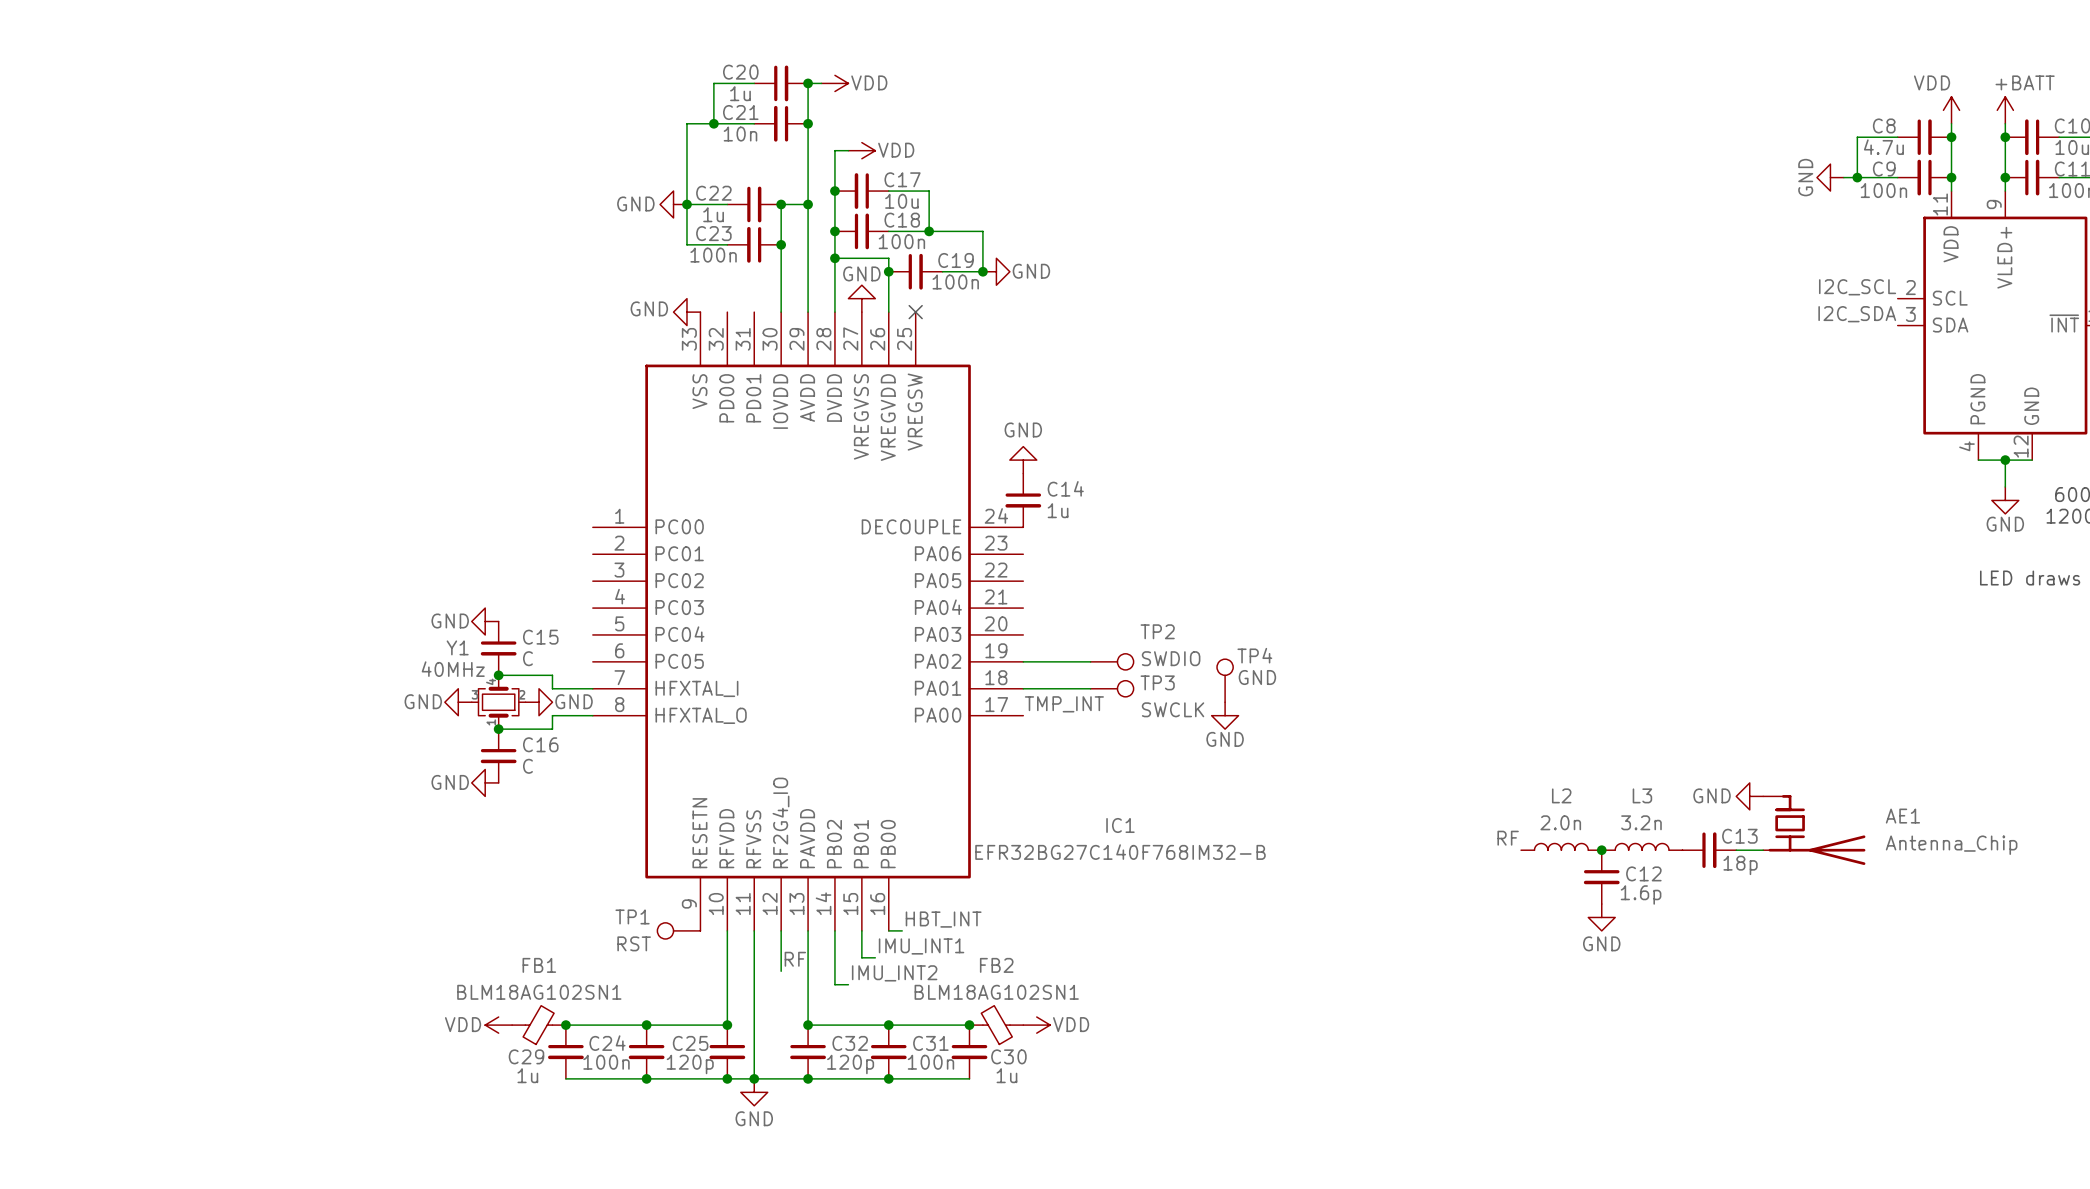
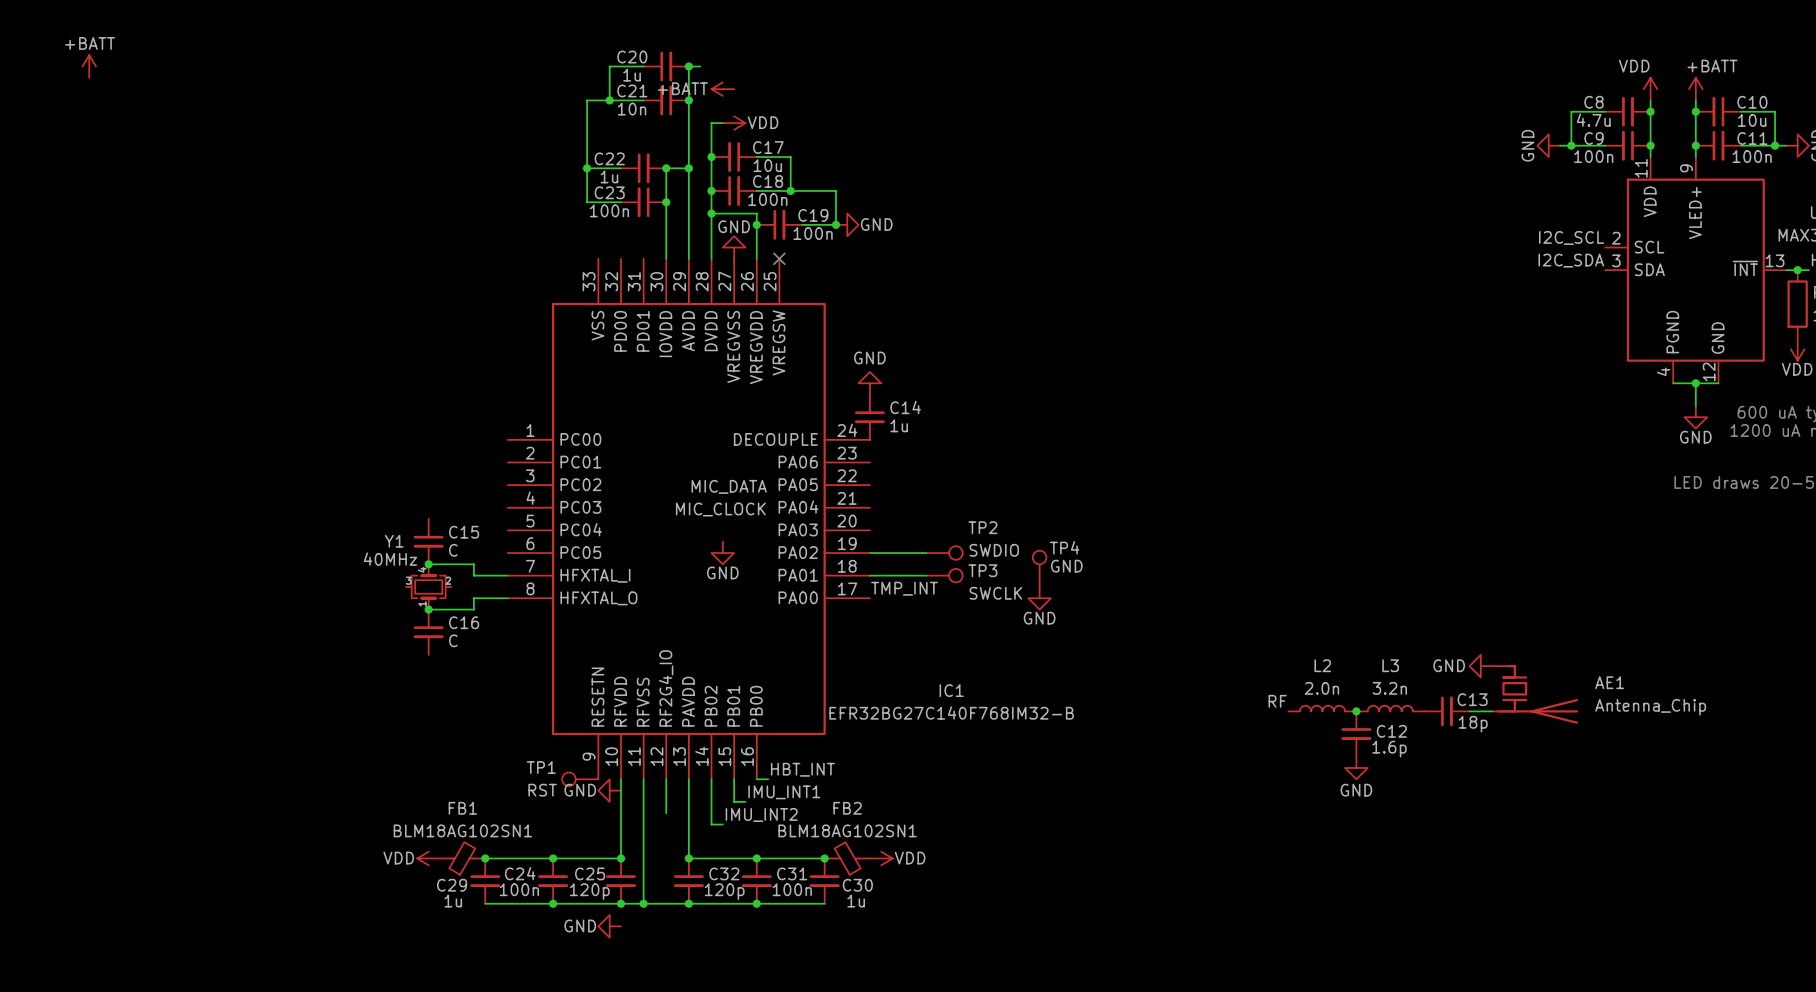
power symbol: none -> +BATT (89, 66)
power symbol: VDD (834, 83) -> none
power symbol: none -> +BATT (722, 89)
power symbol: GND (673, 204) -> none
power symbol: GND (686, 312) -> none
label: none -> MIC_DATA (729, 486)
label: none -> MIC_CLOCK (720, 509)
power symbol: GND (485, 621) -> none
power symbol: none -> GND (722, 553)
power symbol: GND (458, 702) -> none
power symbol: GND (539, 702) -> none
power symbol: GND (485, 782) -> none
power symbol: none -> GND (609, 790)
label: RF (795, 959) -> none
power symbol rotation: 0° (754, 1092) -> 90° clockwise (609, 926)
power symbol position: GND (754, 1092) -> GND (609, 926)

